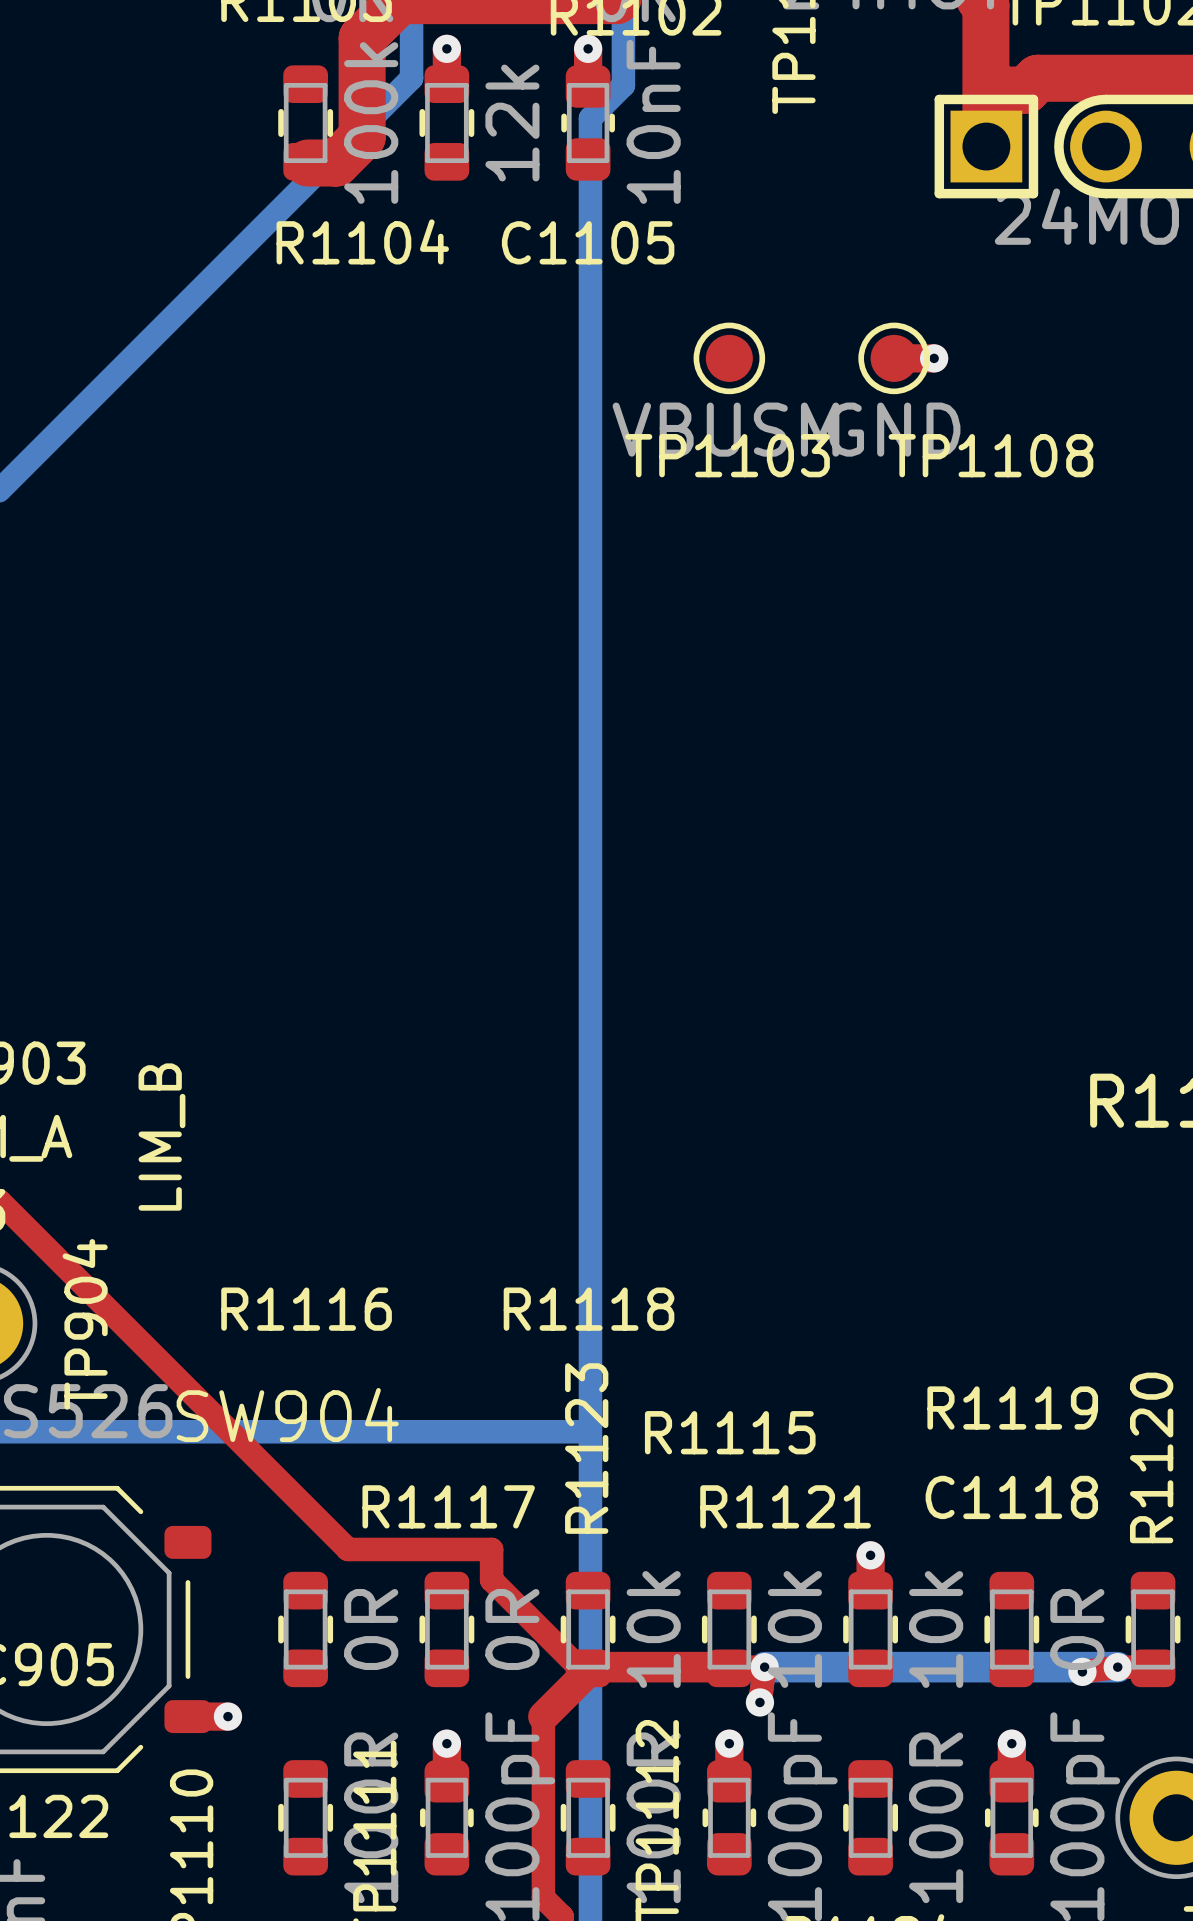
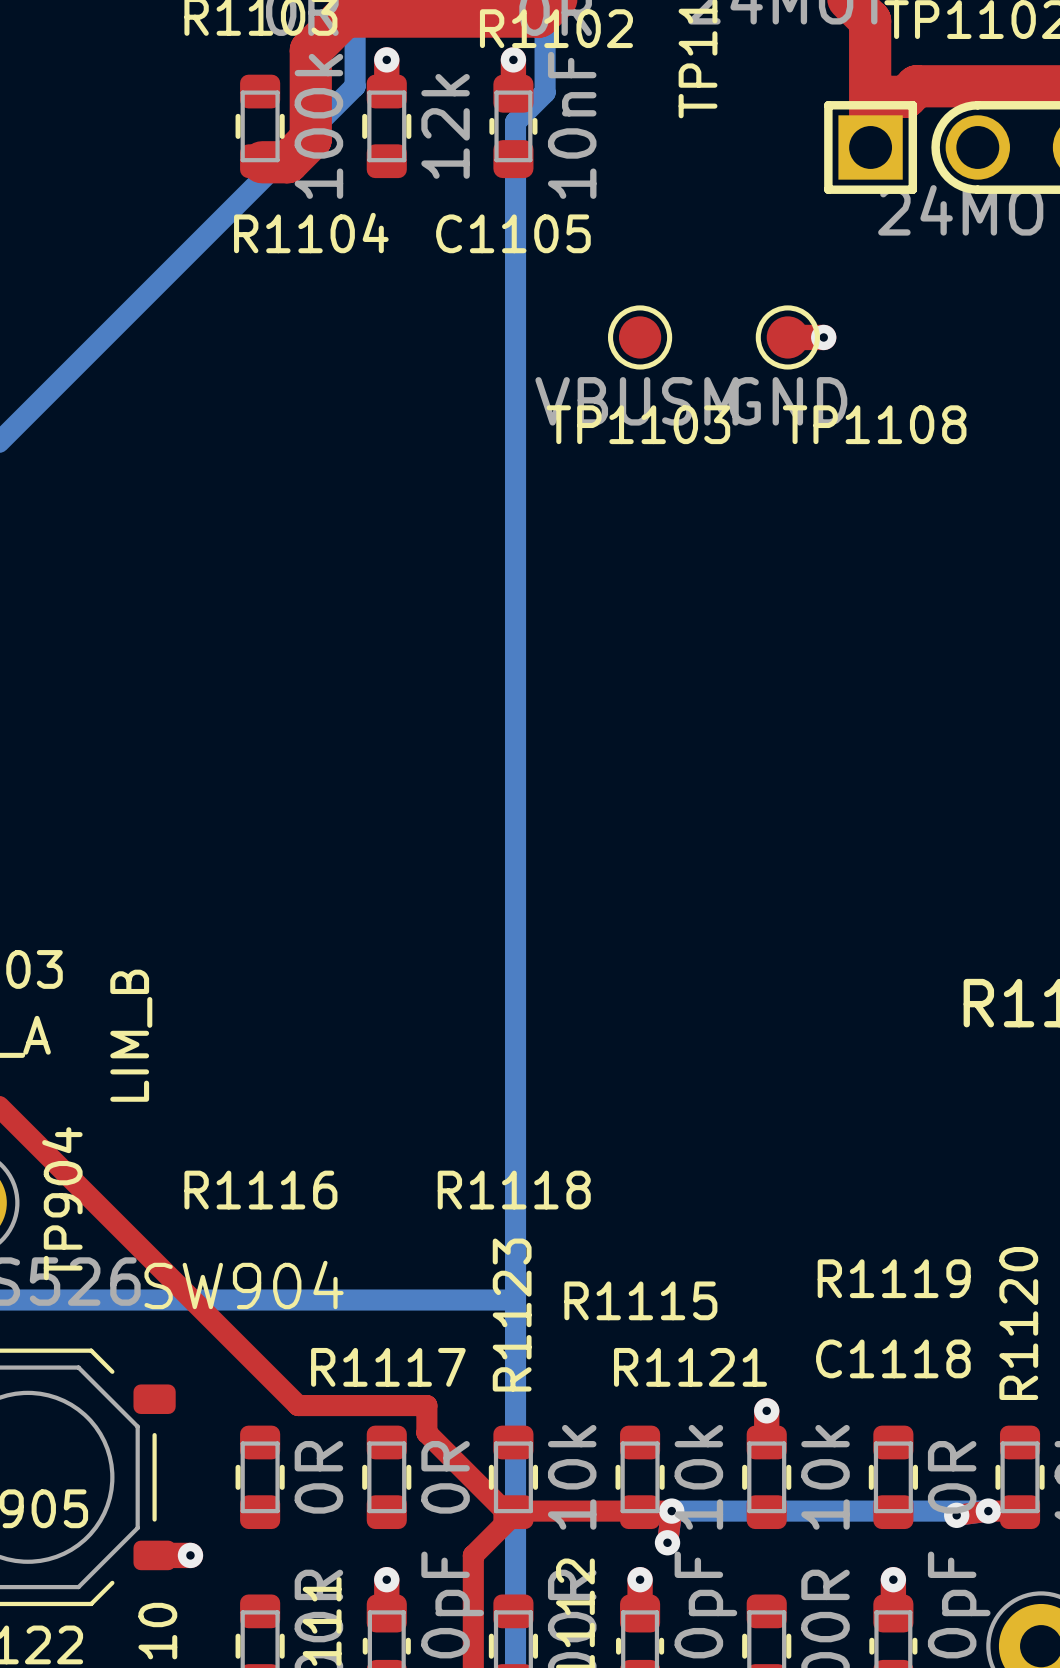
top track width: thick (590, 1667) (726, 1667) -> thin (515, 1511) (637, 1511)
bottom track width: thick (764, 1667) (1117, 1667) -> thin (671, 1511) (988, 1511)
top track width: thick (585, 1674) (543, 1716) -> thin (511, 1517) (473, 1555)

